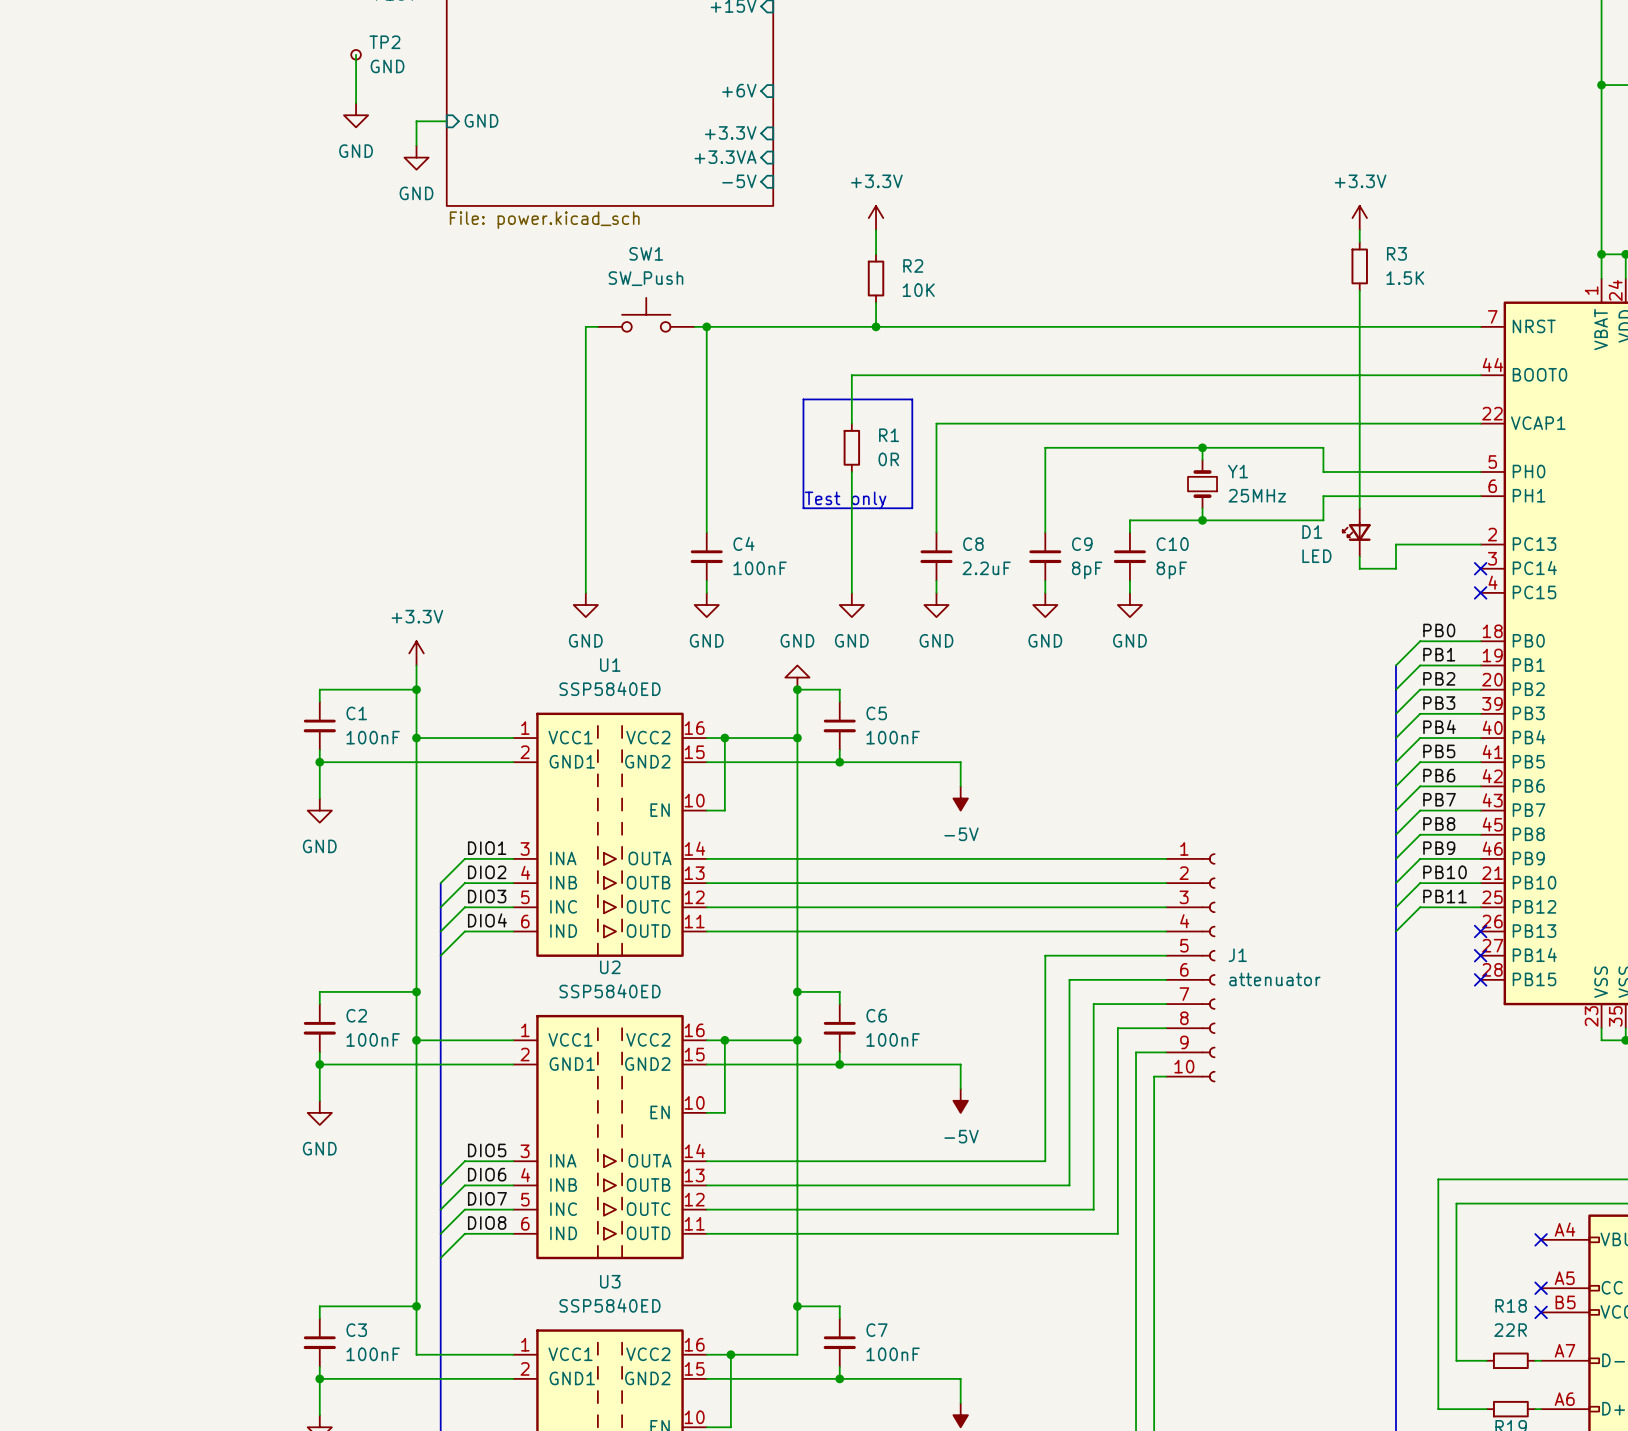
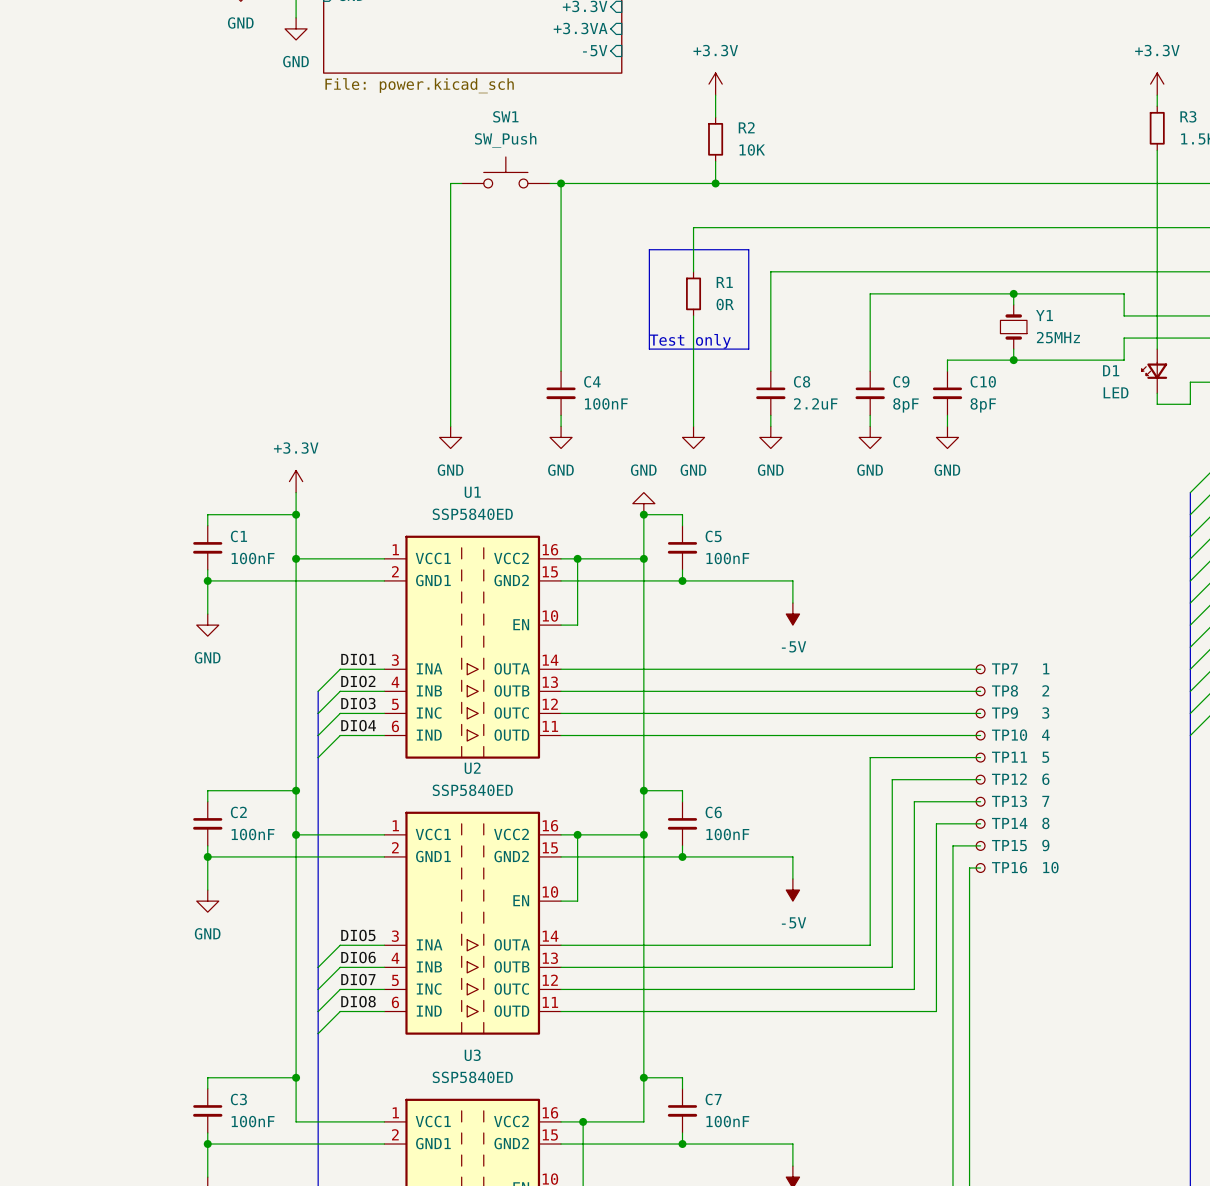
TP7: none -> 1 (980, 669)
TP8: none -> 2 (980, 691)
TP9: none -> 3 (980, 713)
TP10: none -> 4 (980, 735)
TP11: none -> 5 (980, 757)
J1: attenuator (1190, 967) -> none
TP12: none -> 6 (980, 779)
TP13: none -> 7 (980, 801)
TP14: none -> 8 (980, 823)
TP15: none -> 9 (980, 845)
TP16: none -> 10 (980, 867)

